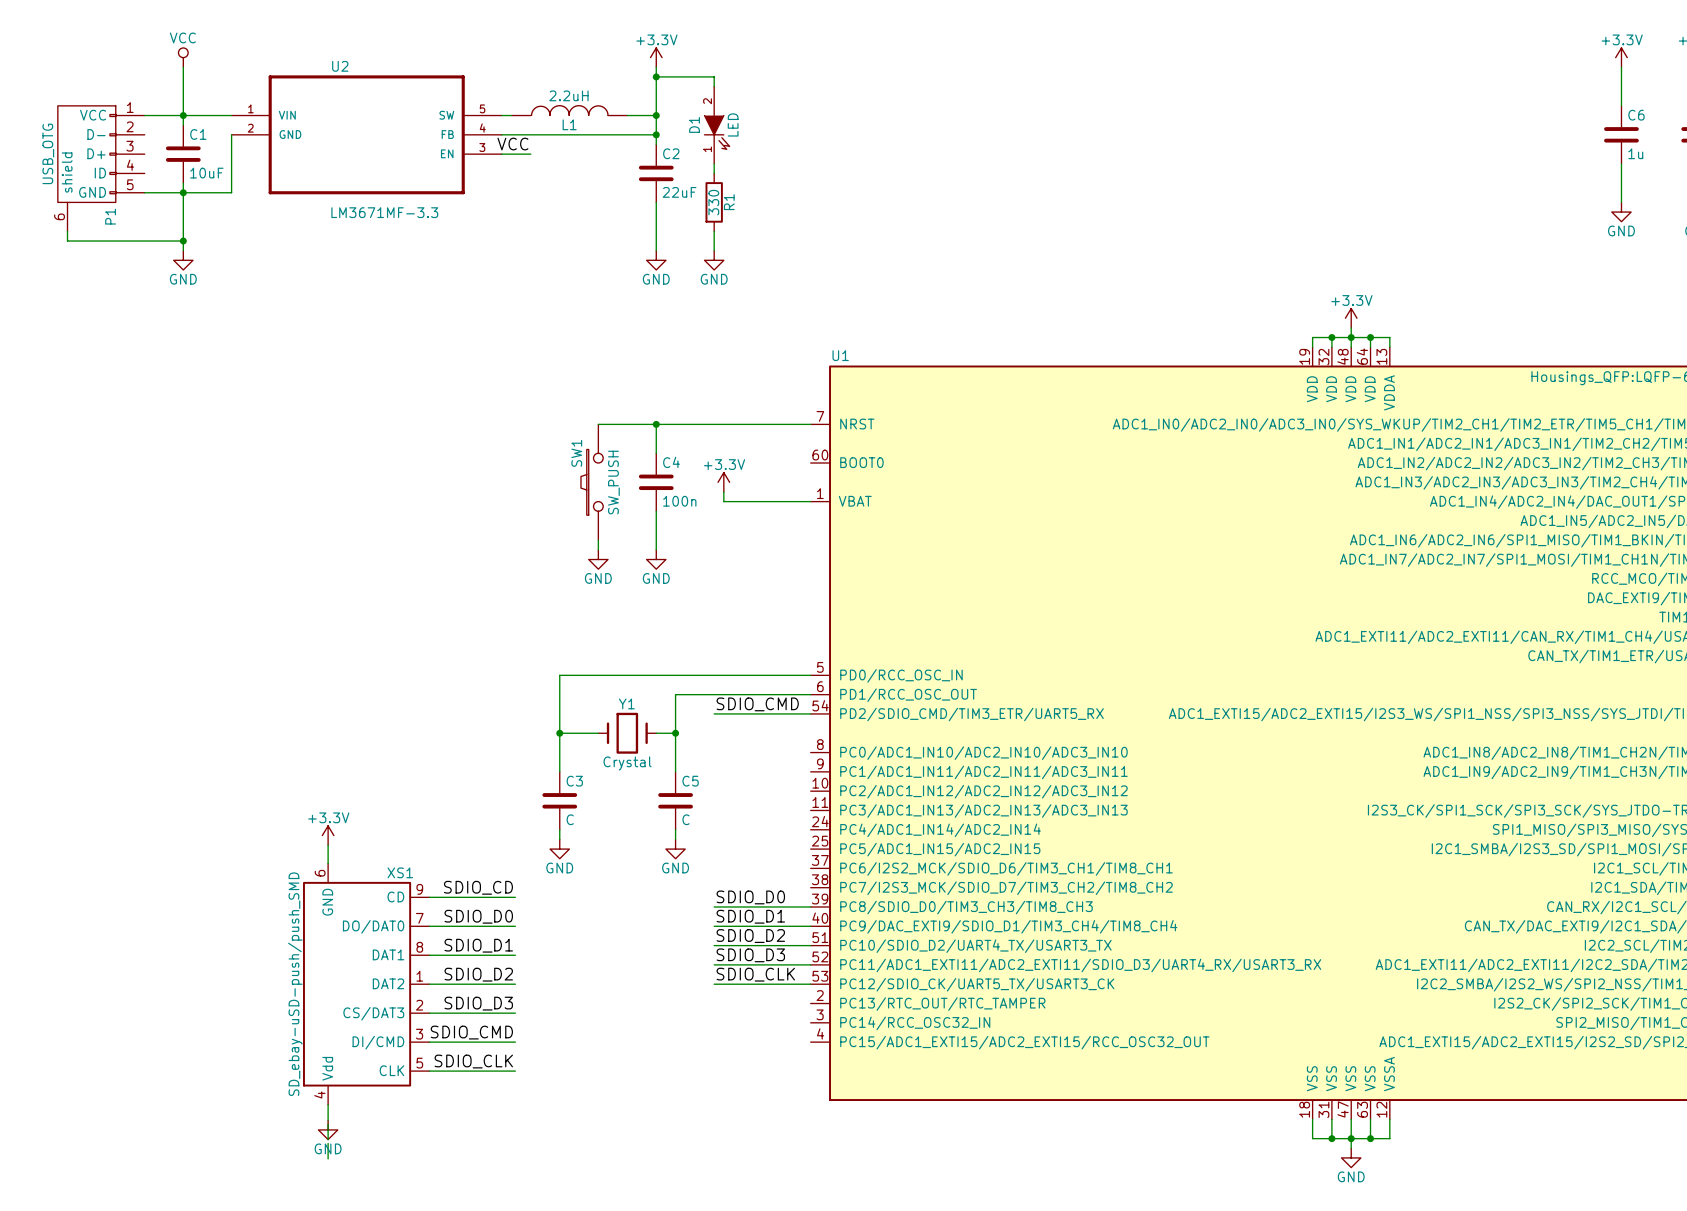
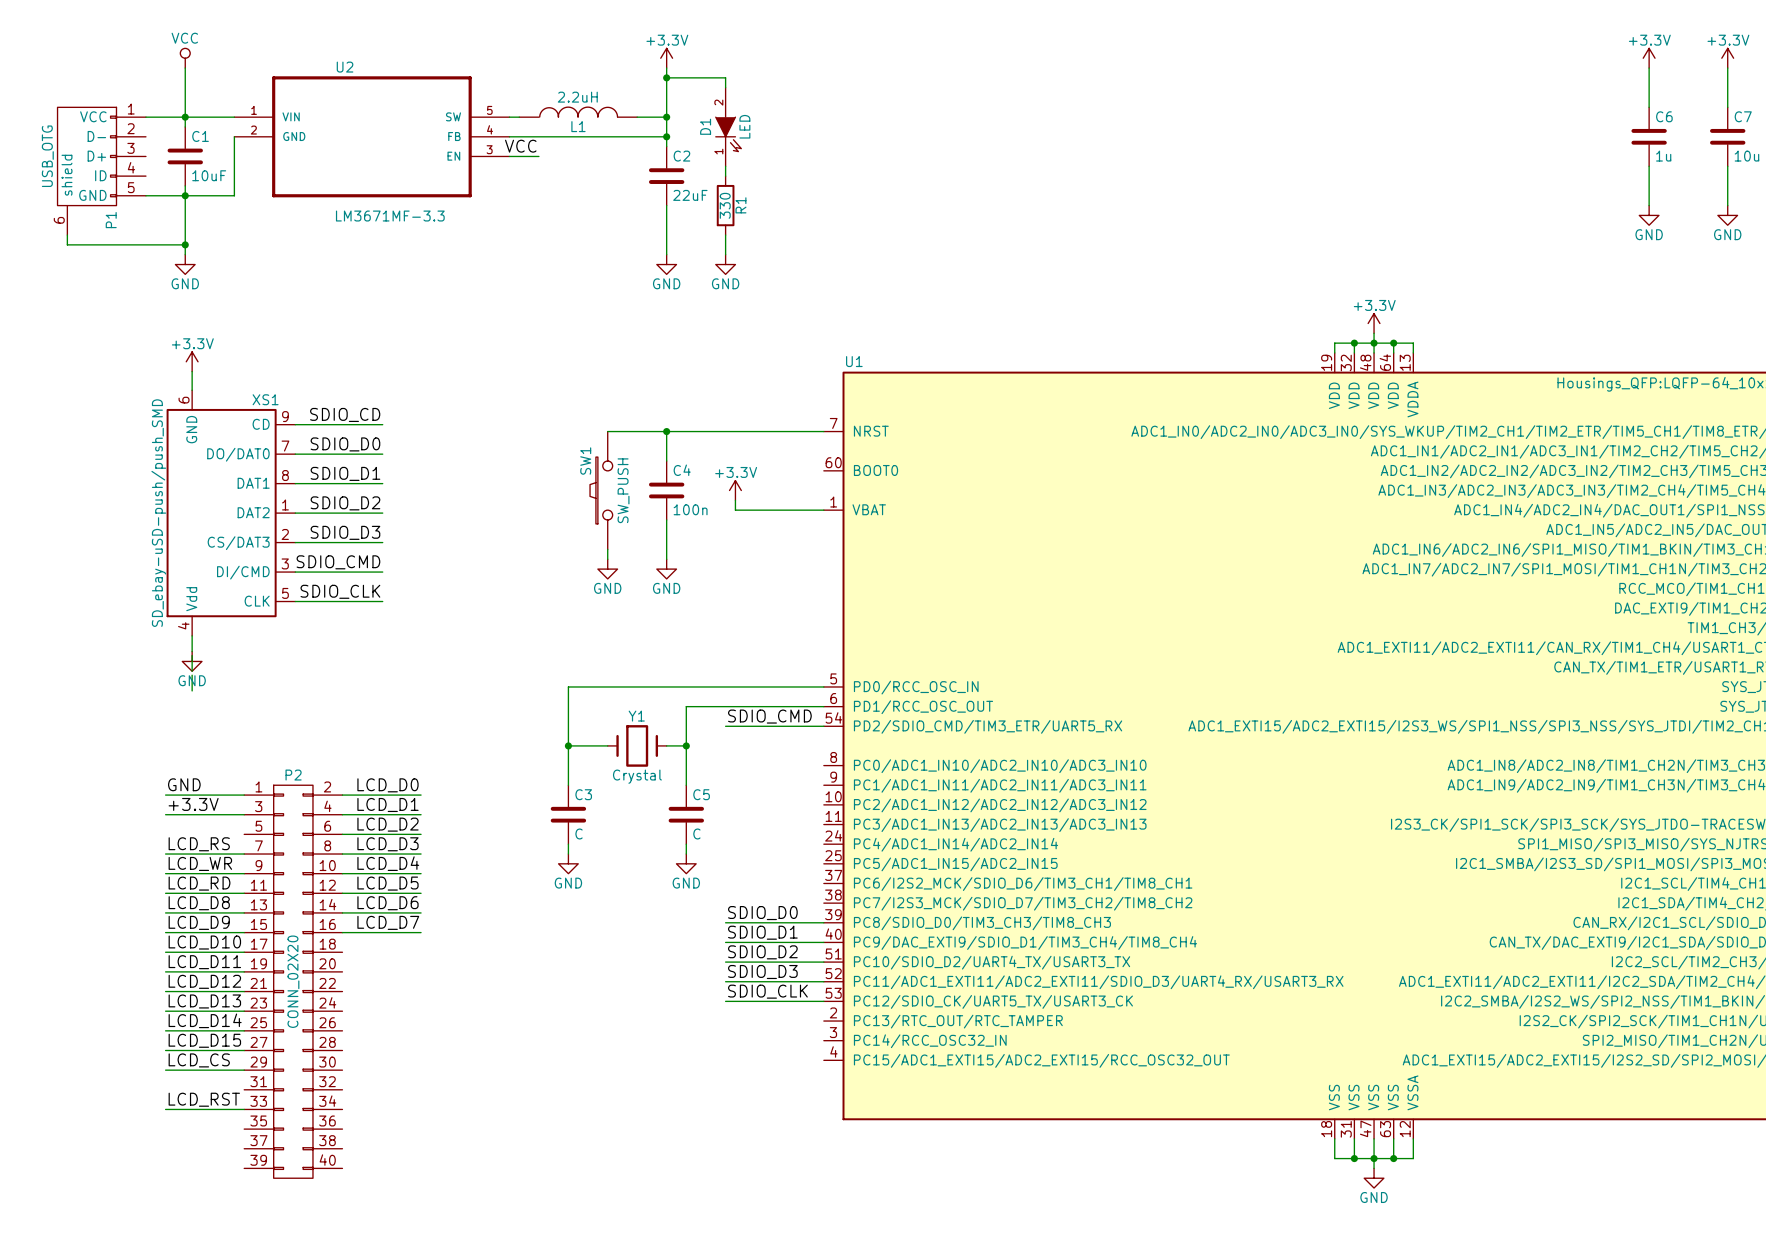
power symbol: none -> +3.3V (192, 361)
wire: none -> (192, 371) (192, 390)
label: none -> SDIO_CD (345, 414)
wire: none -> (295, 424) (382, 424)
label: none -> SDIO_D0 (345, 444)
wire: none -> (295, 454) (382, 454)
label: none -> SDIO_D1 (345, 473)
wire: none -> (295, 483) (382, 483)
label: none -> SDIO_D2 (345, 503)
wire: none -> (295, 513) (382, 513)
label: none -> SDIO_D3 (345, 532)
wire: none -> (295, 542) (382, 542)
label: none -> SDIO_CMD (338, 562)
wire: none -> (295, 572) (382, 572)
label: none -> SDIO_CLK (340, 591)
wire: none -> (295, 601) (382, 601)
wire: none -> (192, 635) (192, 651)
wire: none -> (192, 655) (192, 671)
power symbol: none -> GND (192, 661)
wire: none -> (192, 675) (192, 690)
label: none -> GND (184, 784)
label: none -> LCD_D0 (387, 785)
wire: none -> (165, 795) (244, 795)
wire: none -> (342, 795) (421, 795)
label: none -> +3.3V (193, 804)
label: none -> LCD_D1 (387, 804)
wire: none -> (165, 814) (244, 814)
wire: none -> (342, 814) (421, 814)
label: none -> LCD_D2 (387, 824)
wire: none -> (342, 834) (421, 834)
label: none -> LCD_RS (199, 844)
label: none -> LCD_D3 (387, 844)
power symbol: +3.3V (328, 835) -> none
wire: none -> (165, 854) (244, 854)
wire: none -> (342, 854) (421, 854)
wire: (328, 845) (328, 863) -> none
label: none -> LCD_D4 (388, 863)
label: none -> LCD_WR (200, 863)
wire: none -> (165, 873) (244, 873)
wire: none -> (342, 873) (421, 873)
label: none -> LCD_RD (199, 883)
label: none -> LCD_D5 (387, 883)
wire: none -> (165, 893) (244, 893)
wire: none -> (342, 893) (421, 893)
label: none -> LCD_D8 (199, 903)
label: none -> LCD_D6 (387, 903)
label: SDIO_CD (478, 887) -> none
wire: none -> (165, 912) (244, 912)
wire: none -> (342, 912) (421, 912)
wire: (429, 897) (515, 897) -> none
label: none -> LCD_D9 (199, 922)
label: none -> LCD_D7 (388, 922)
wire: none -> (165, 932) (244, 932)
wire: none -> (342, 932) (421, 932)
label: SDIO_D0 (478, 916) -> none
label: none -> LCD_D10 (204, 942)
wire: (429, 926) (515, 926) -> none
wire: none -> (165, 952) (244, 952)
label: none -> LCD_D11 (204, 962)
label: SDIO_D1 (478, 945) -> none
wire: none -> (165, 971) (244, 971)
wire: (429, 955) (515, 955) -> none
P2: none -> CONN_02X20 (293, 981)
label: none -> LCD_D12 (204, 981)
wire: none -> (165, 991) (244, 991)
label: SDIO_D2 (478, 974) -> none
label: none -> LCD_D13 (204, 1001)
XS1 position: (366, 984) -> (230, 513)
wire: (429, 984) (515, 984) -> none
wire: none -> (165, 1011) (244, 1011)
label: none -> LCD_D14 (205, 1020)
label: SDIO_D3 (478, 1003) -> none
wire: none -> (165, 1030) (244, 1030)
wire: (429, 1013) (515, 1013) -> none
label: none -> LCD_D15 (204, 1040)
wire: none -> (165, 1050) (244, 1050)
label: SDIO_CMD (471, 1032) -> none
label: none -> LCD_CS (199, 1060)
wire: (429, 1042) (515, 1042) -> none
wire: none -> (165, 1070) (244, 1070)
label: SDIO_CLK (473, 1061) -> none
wire: (429, 1071) (515, 1071) -> none
label: none -> LCD_RST (204, 1099)
wire: none -> (165, 1109) (244, 1109)
wire: (328, 1104) (328, 1120) -> none
wire: (328, 1124) (328, 1139) -> none
power symbol: GND (328, 1129) -> none
wire: (328, 1143) (328, 1158) -> none

